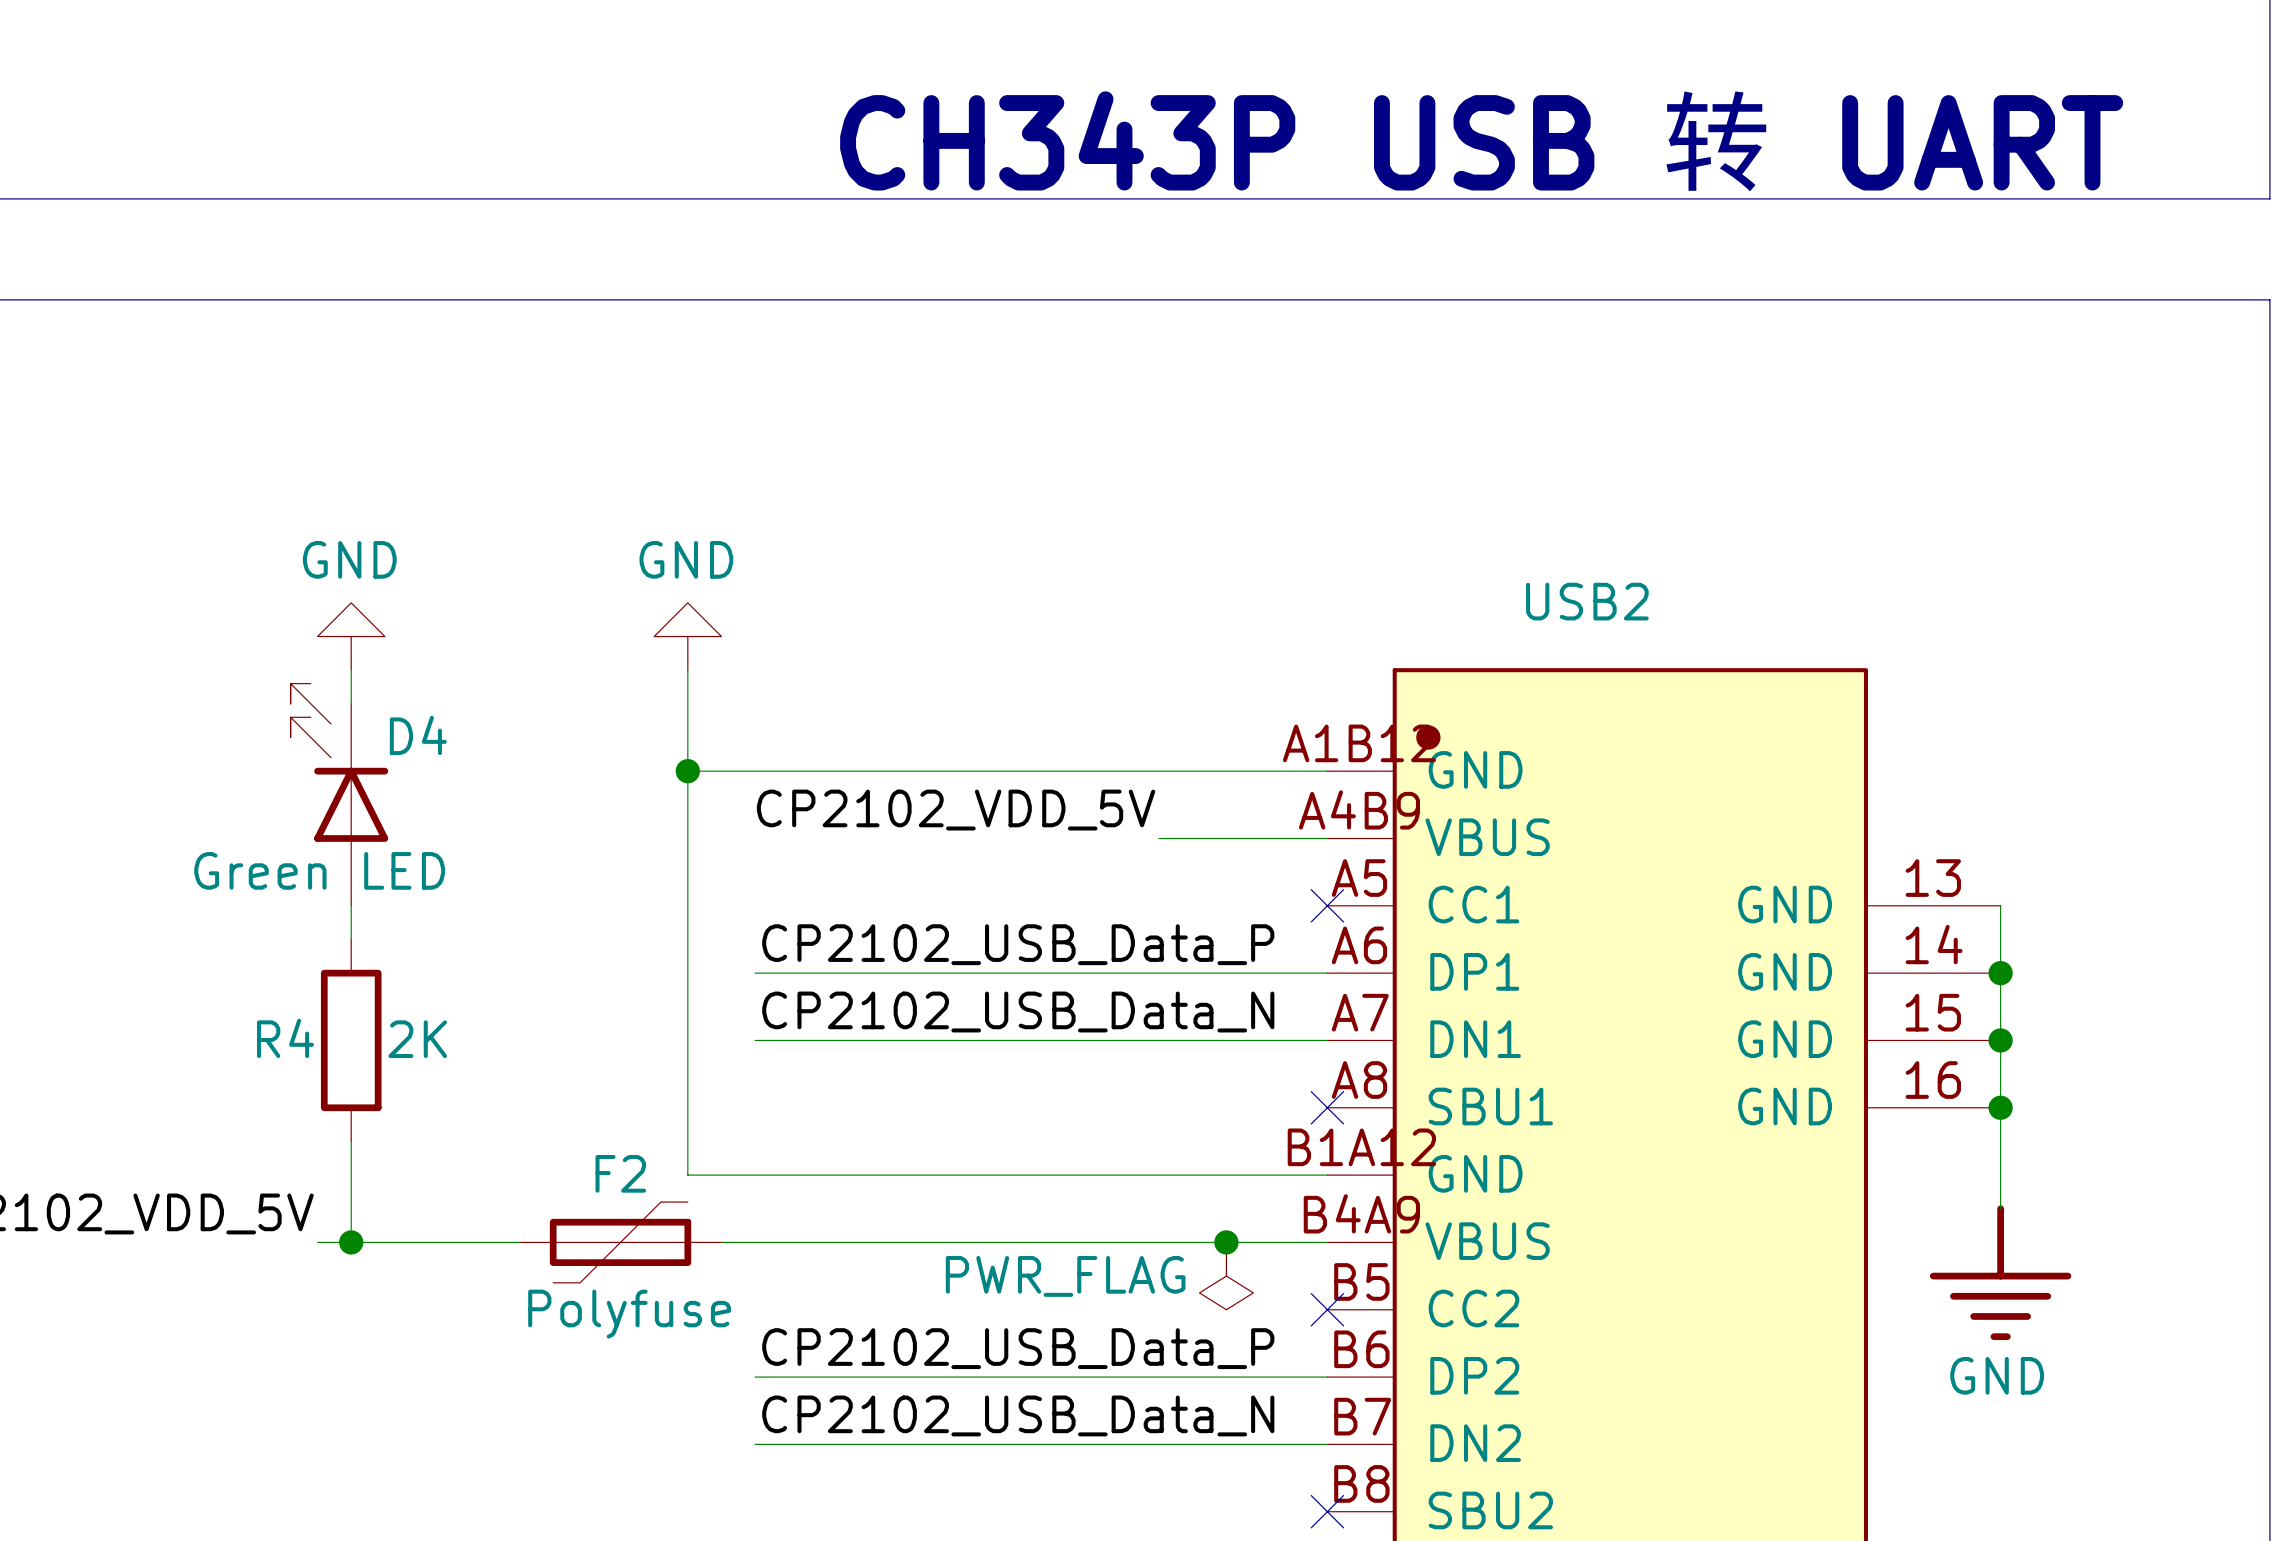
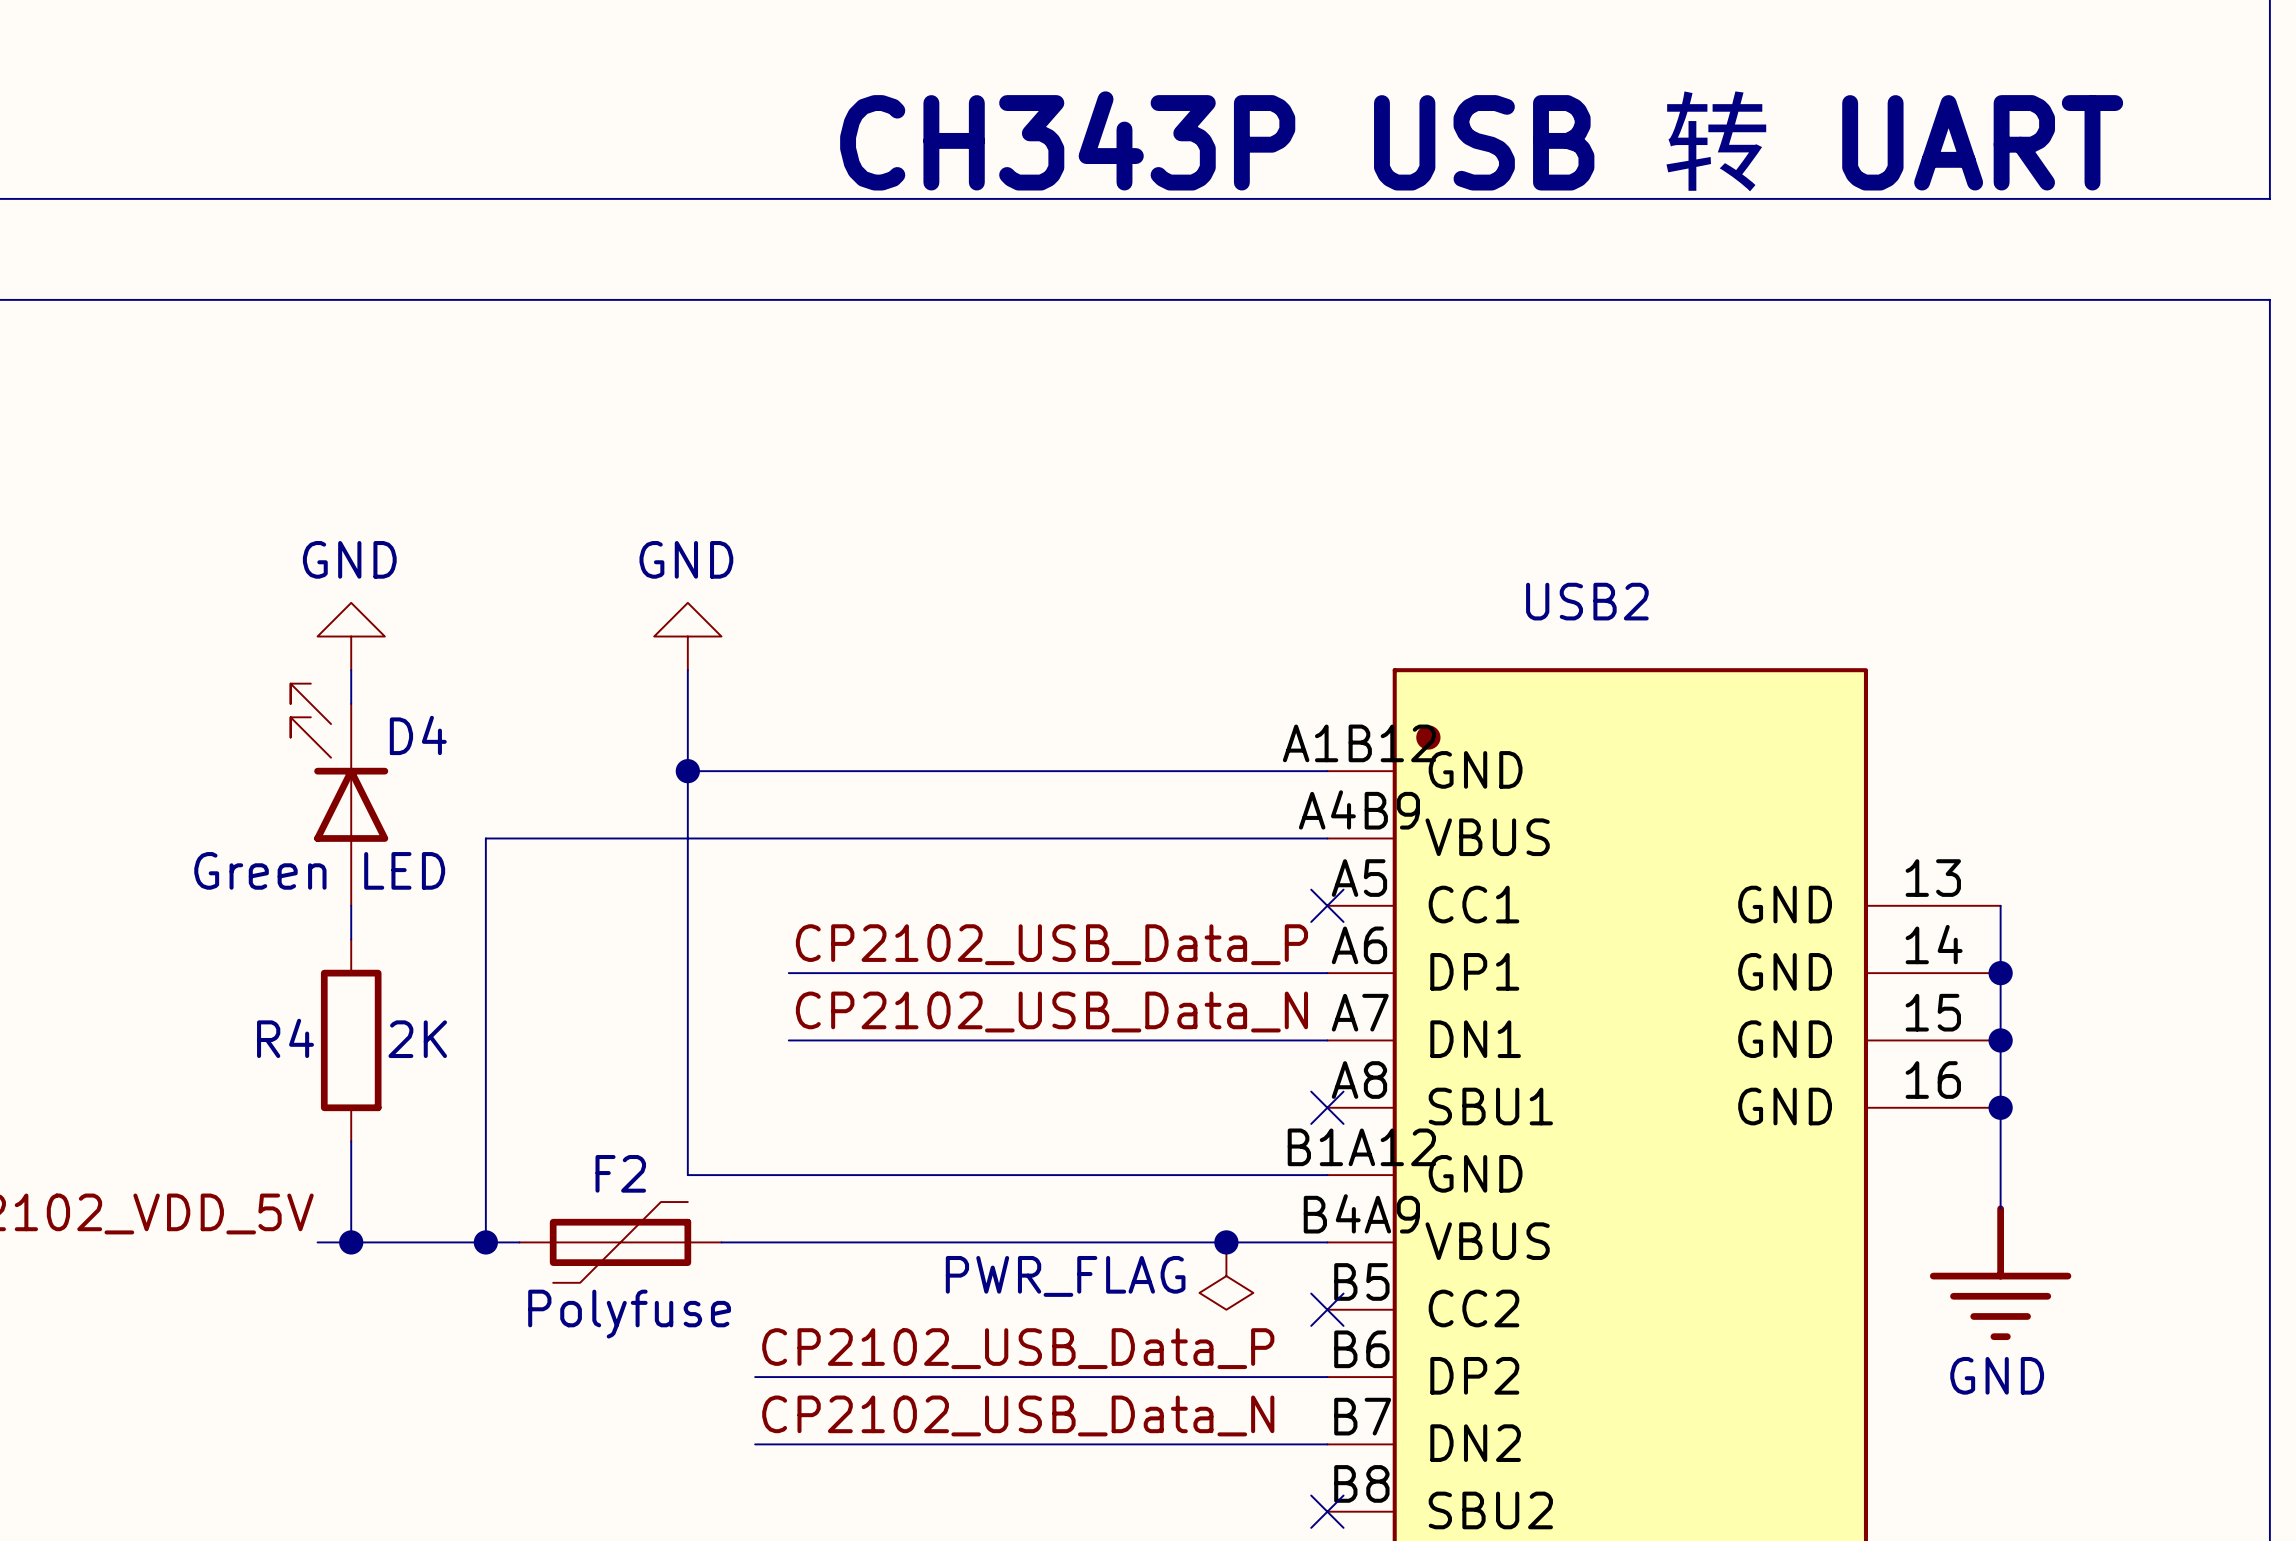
label: CP2102_VDD_5V (956, 810) -> none
wire: none -> (1159, 838) (485, 838) (485, 1242)
label position: CP2102_USB_Data_P (1018, 944) -> CP2102_USB_Data_P (1051, 944)
wire: (755, 973) (788, 973) -> none
label position: CP2102_USB_Data_N (1018, 1012) -> CP2102_USB_Data_N (1051, 1012)
wire: (755, 1040) (788, 1040) -> none
junction: none -> (485, 1242)

